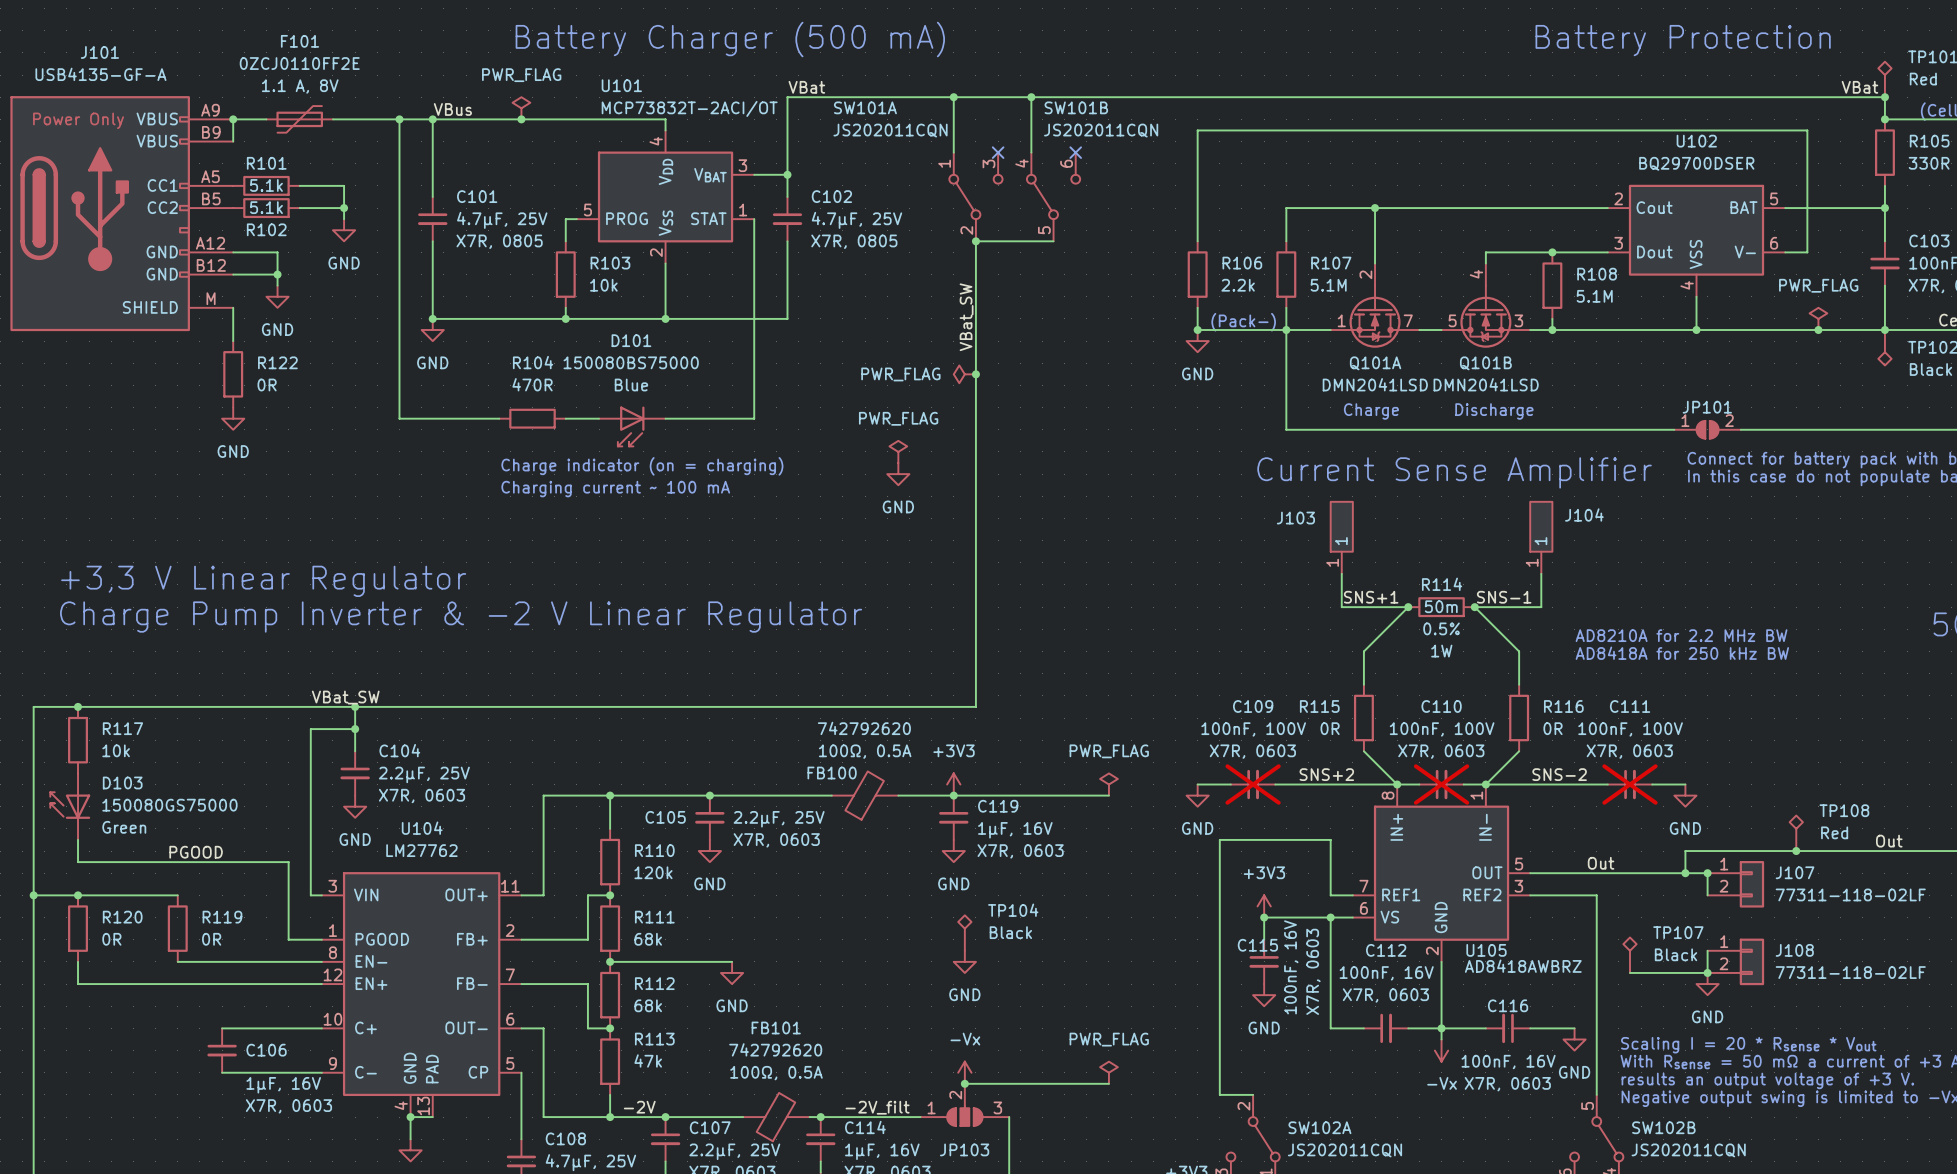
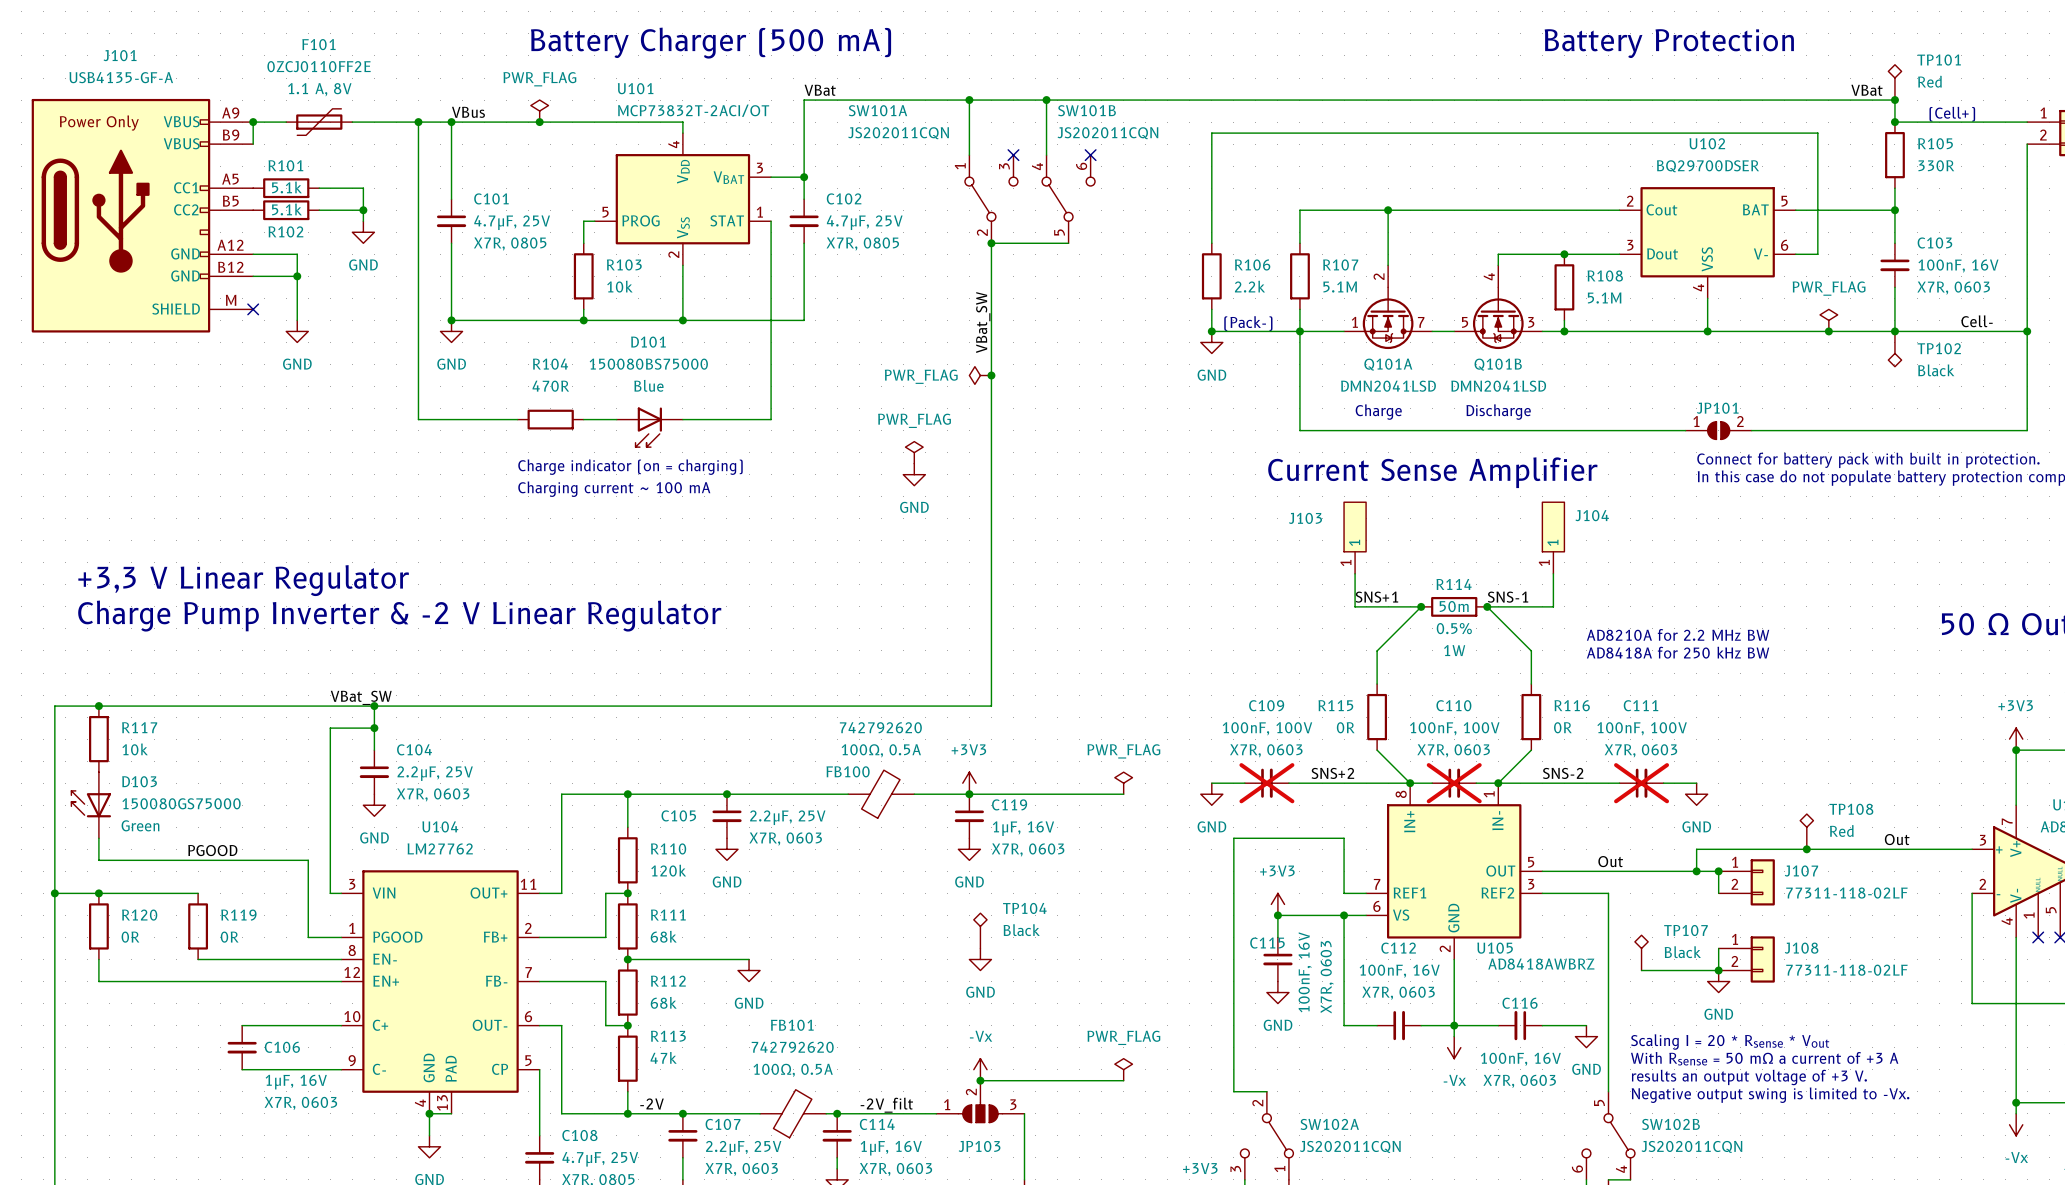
power symbol position: GND (277, 296) -> GND (297, 331)
wire: (233, 307) (233, 341) -> (297, 287) (297, 320)
no-connect mark: none -> (253, 309)
R122: (233, 374) -> none
power symbol: GND (233, 418) -> none

